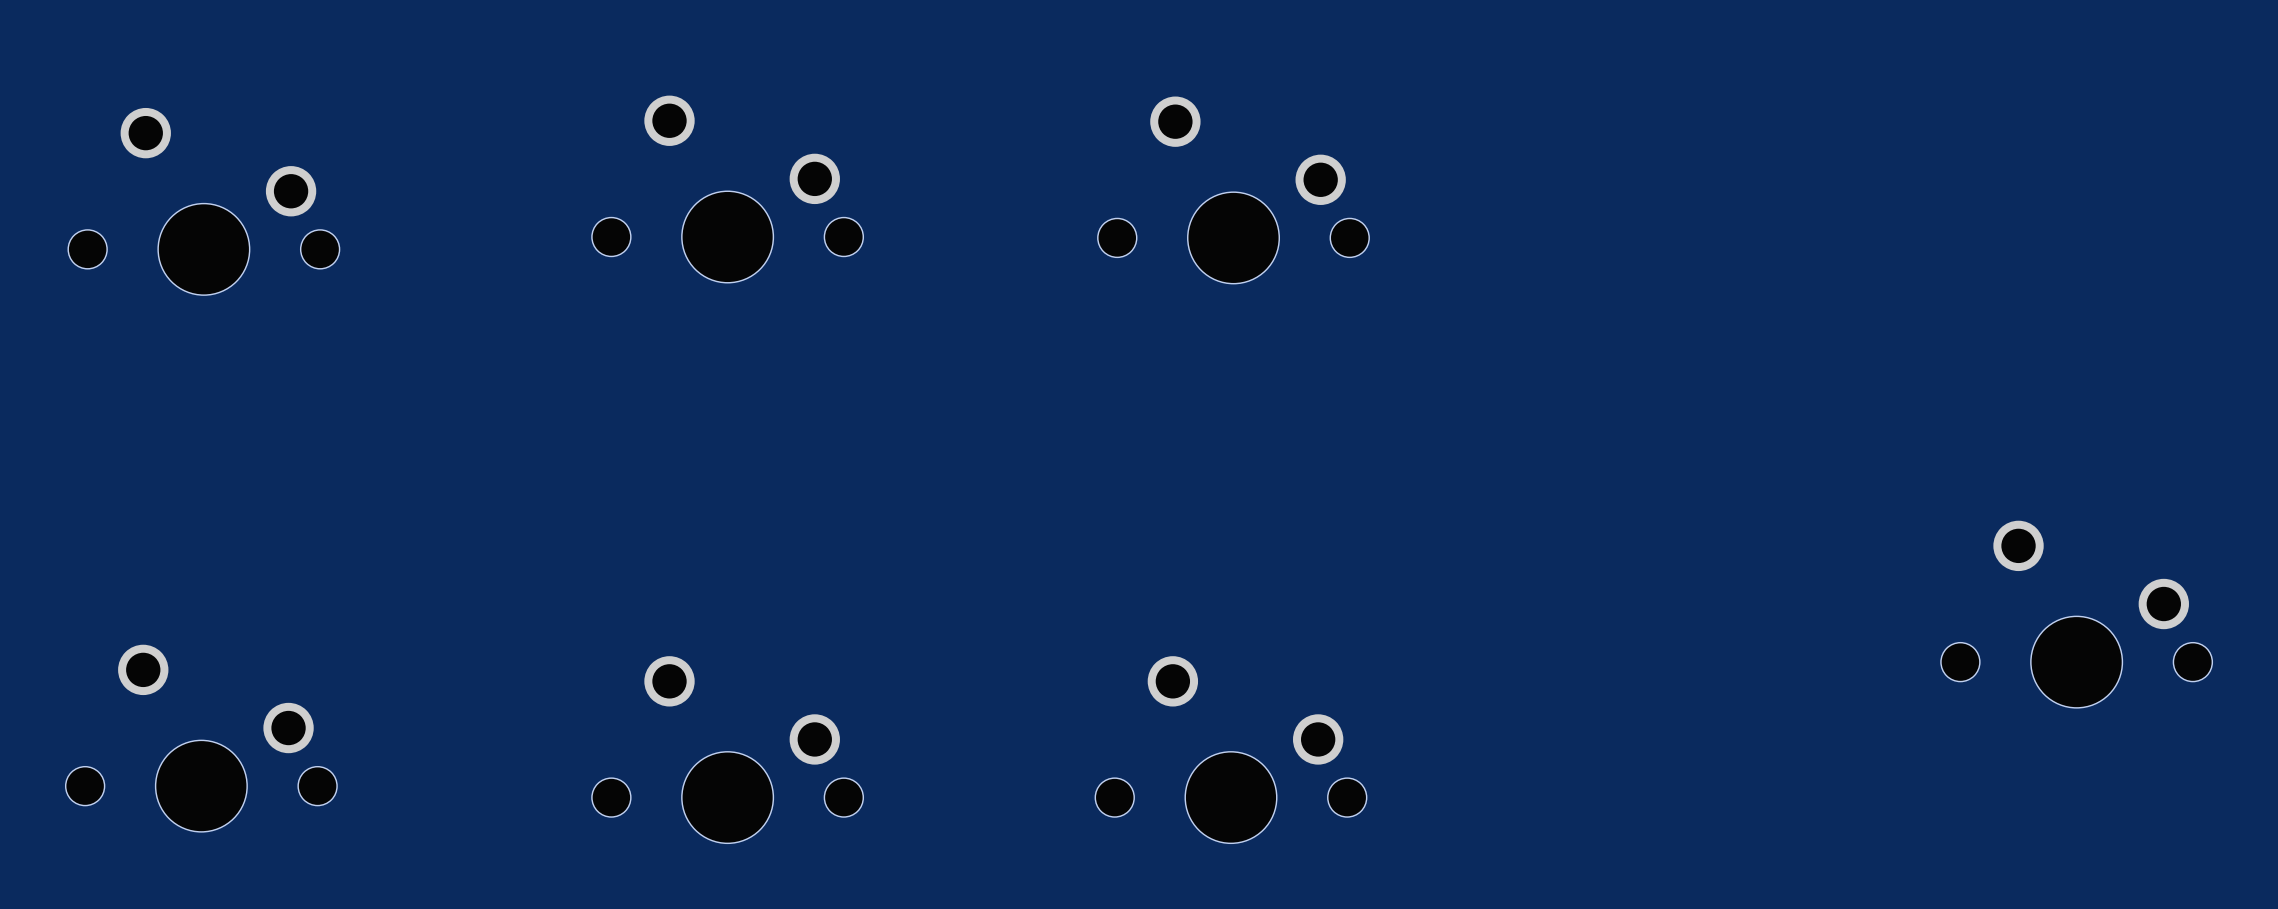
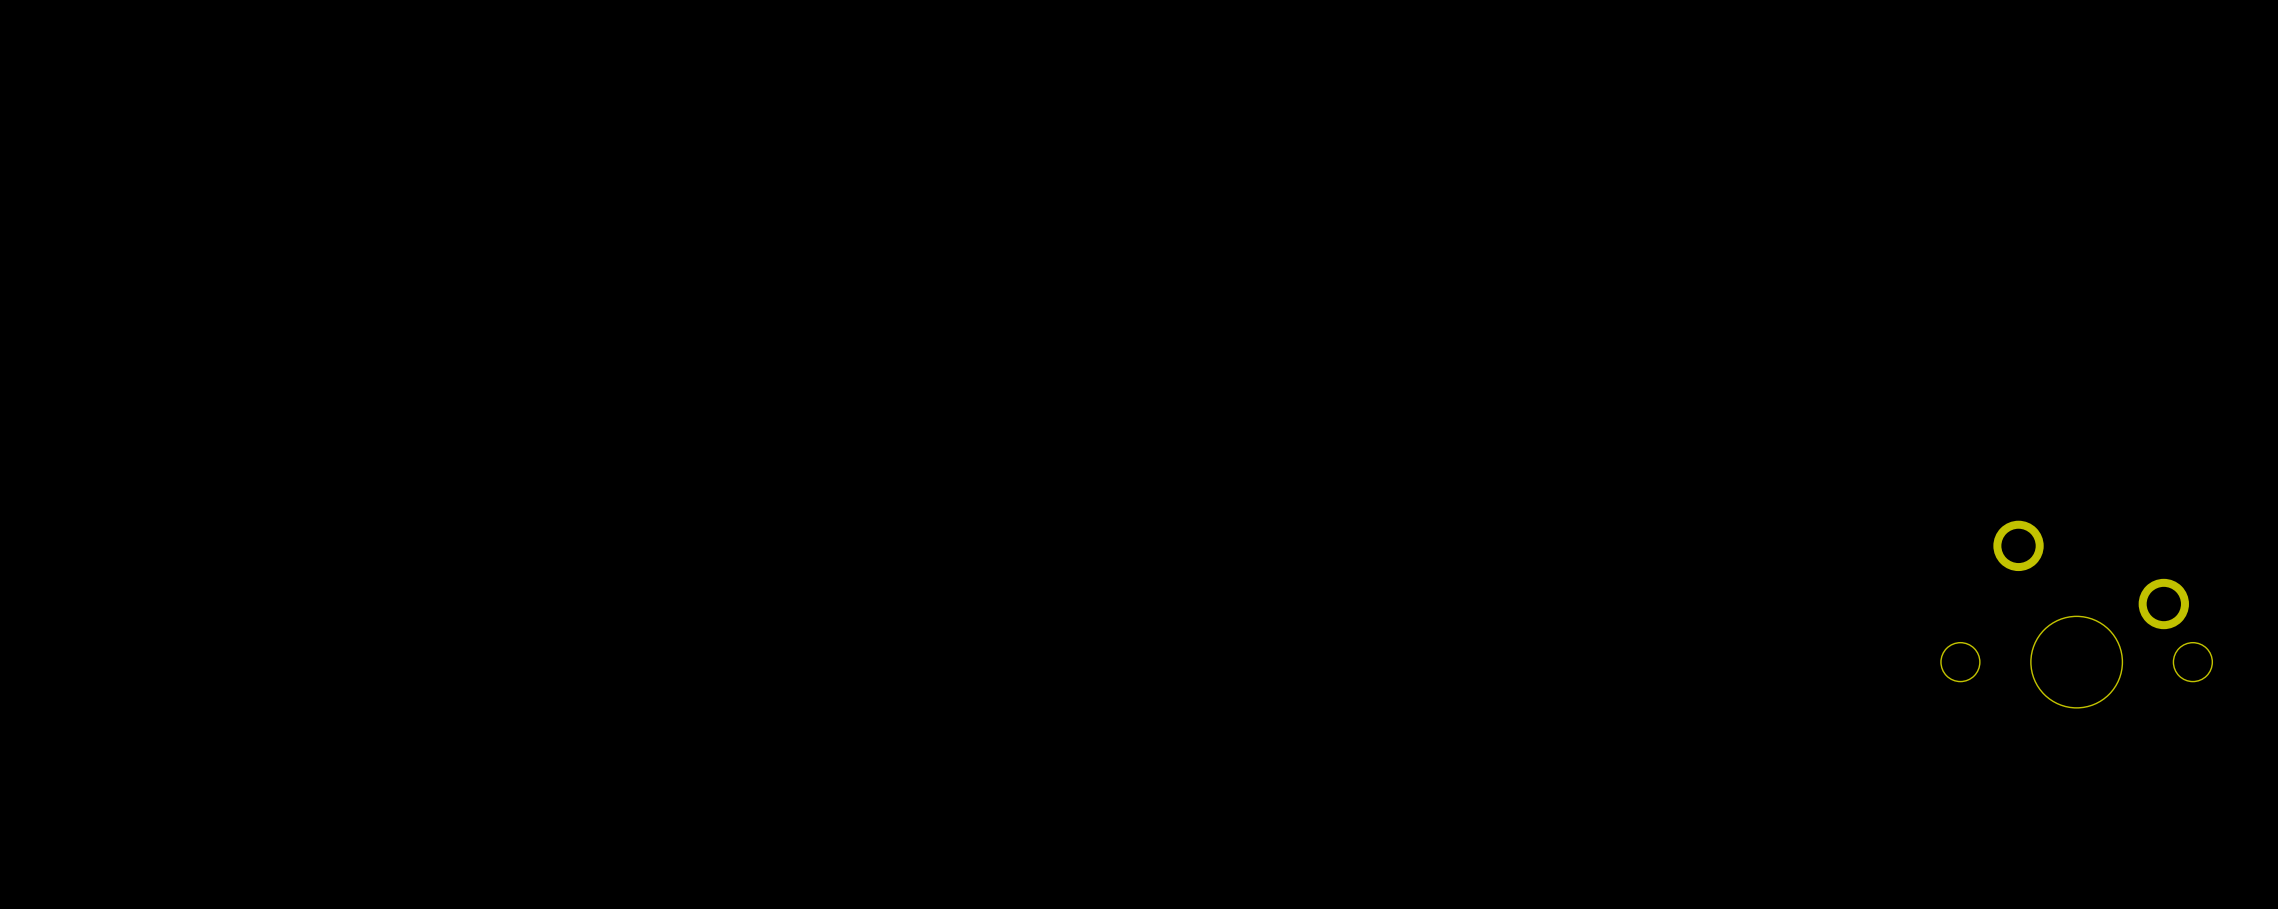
part: (727, 189) -> none
part: (1233, 190) -> none
part: (203, 201) -> none
part: (201, 738) -> none
part: (727, 749) -> none
part: (1230, 749) -> none

